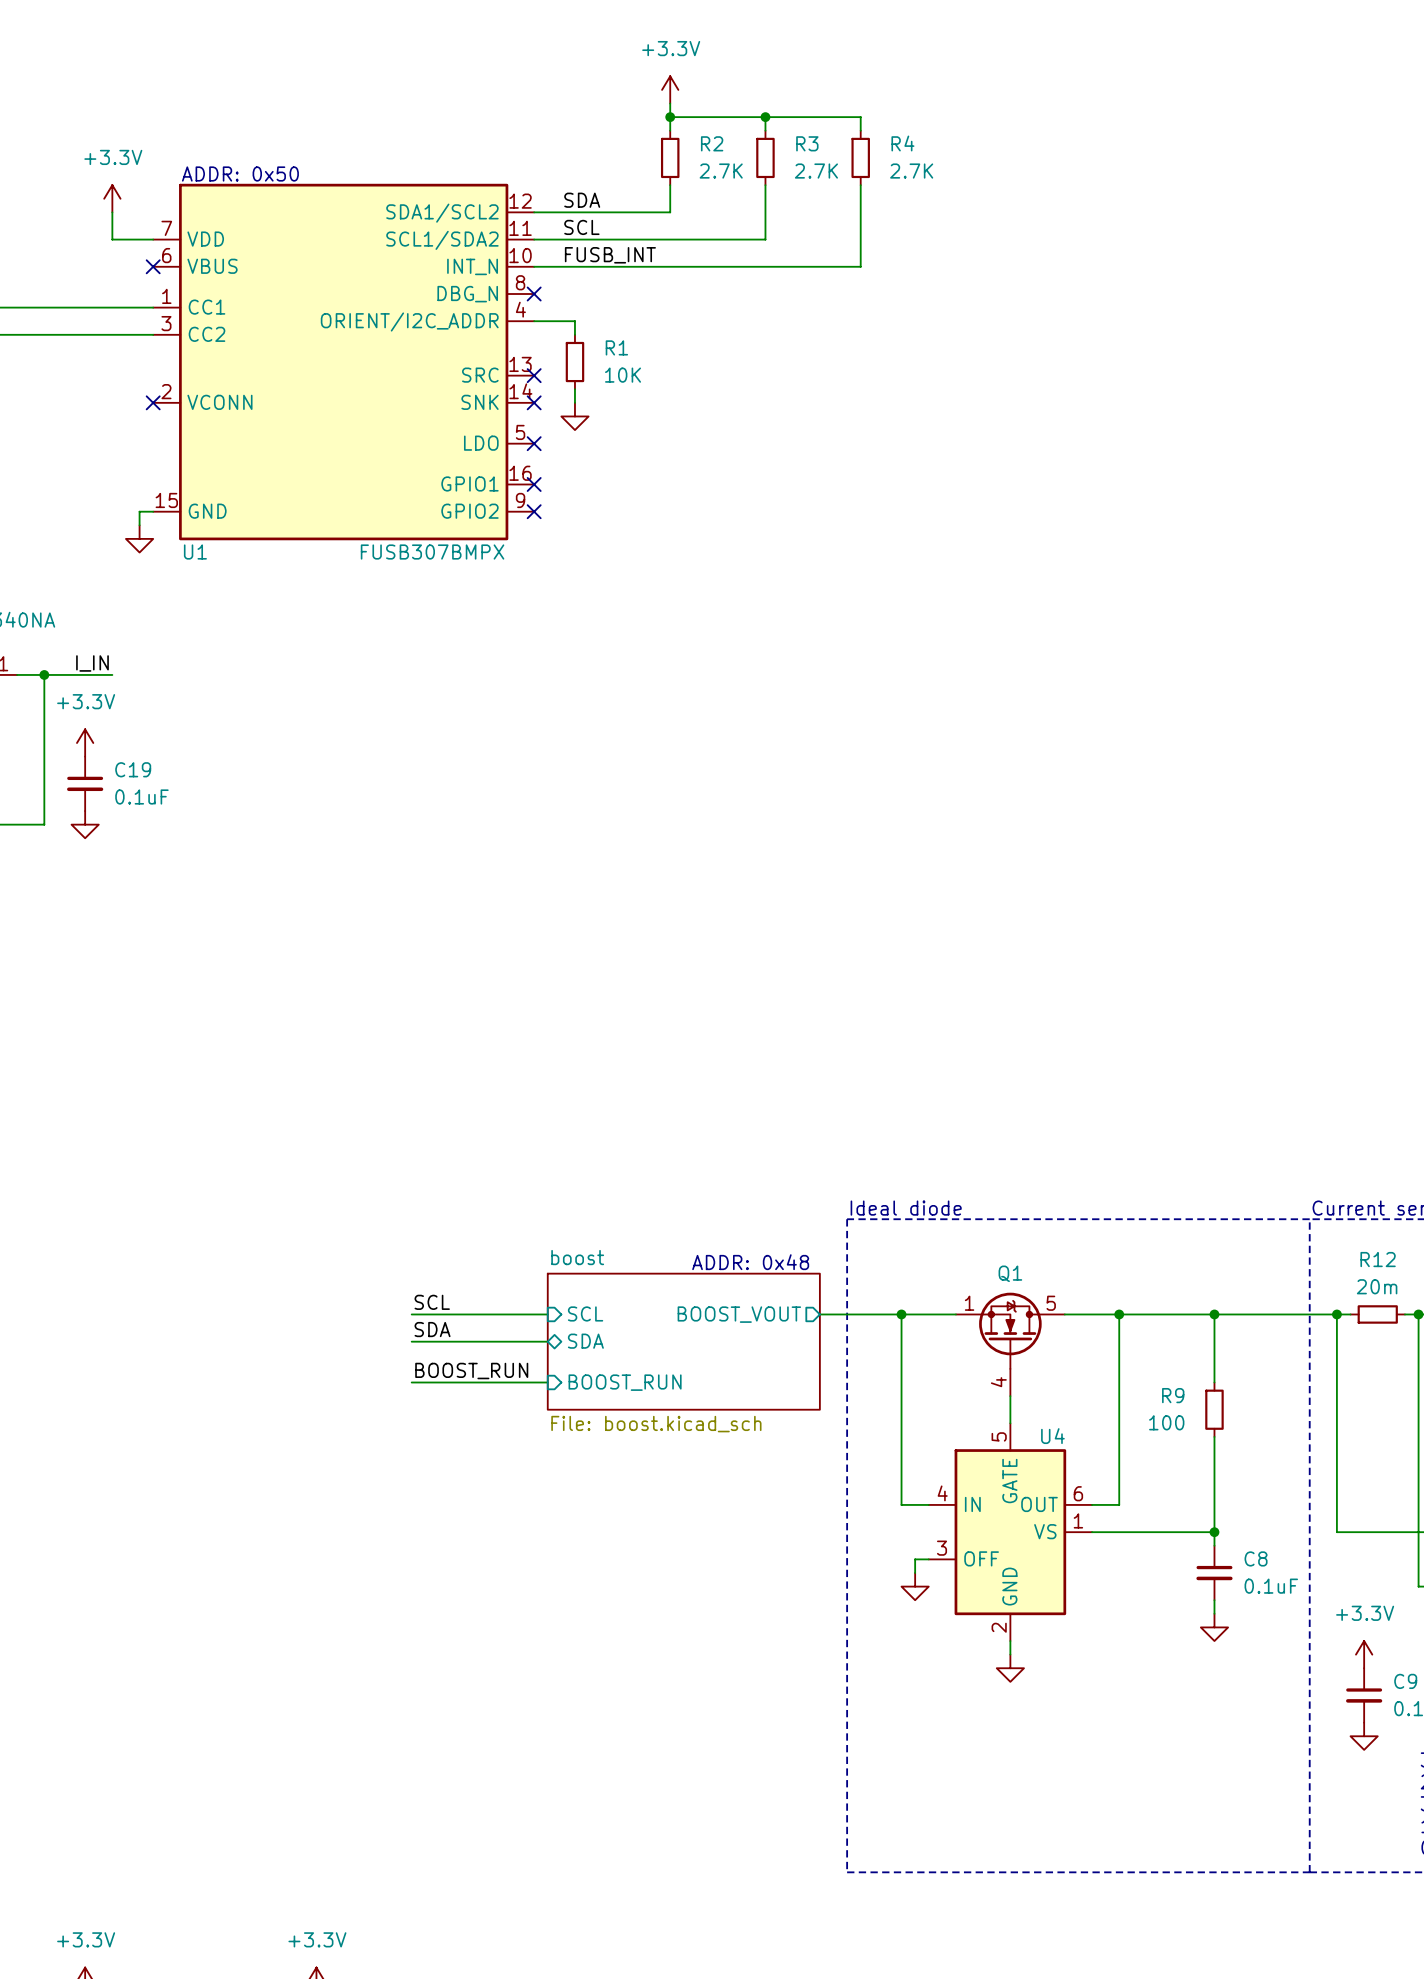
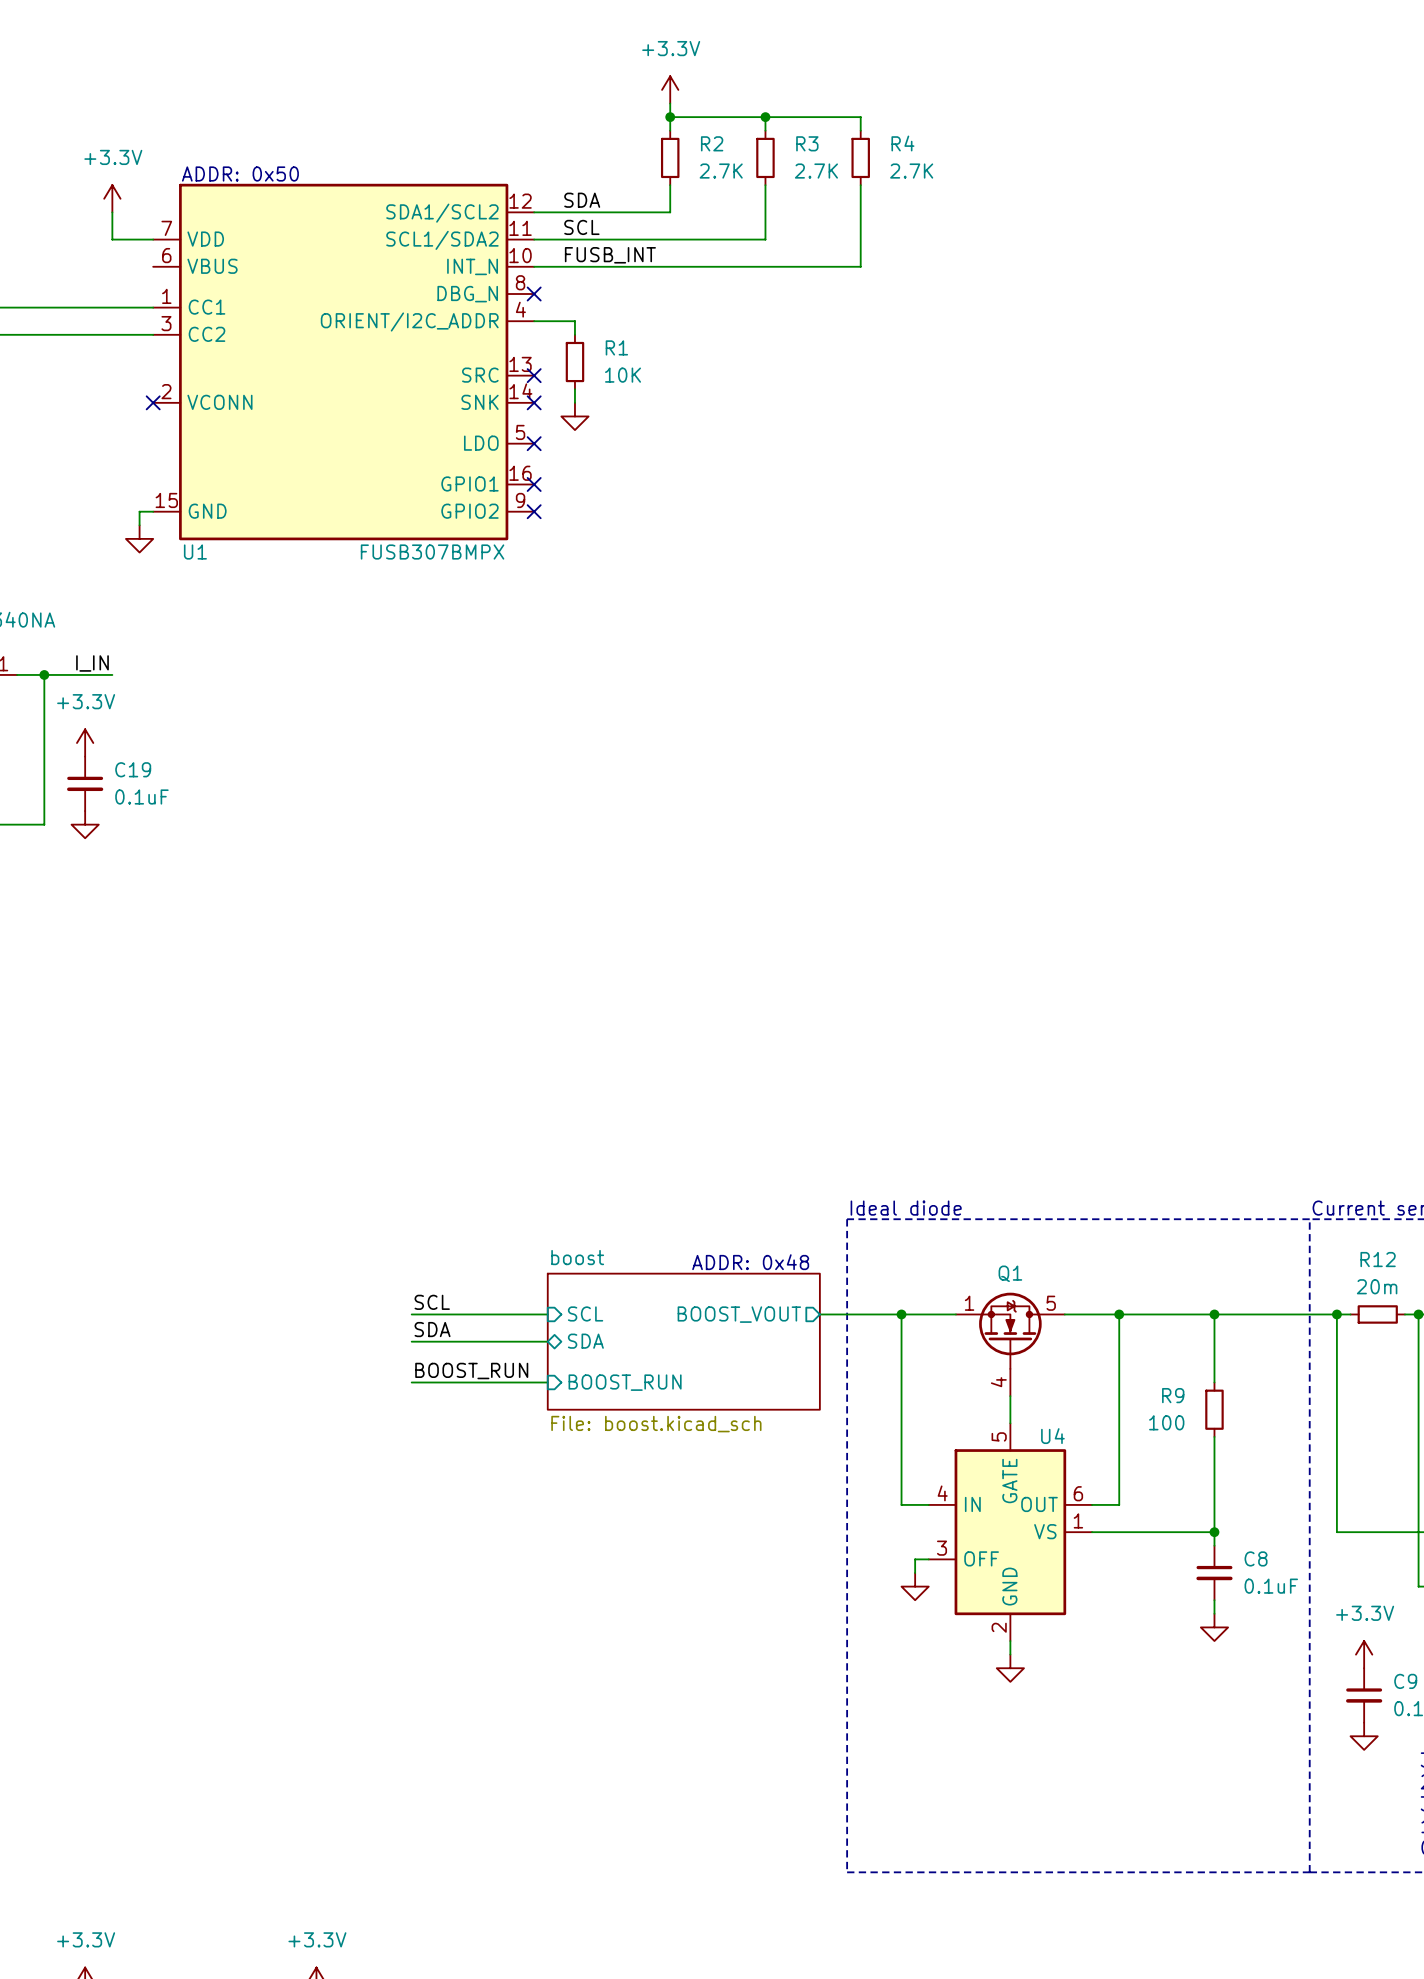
no-connect mark: (153, 266) -> none

